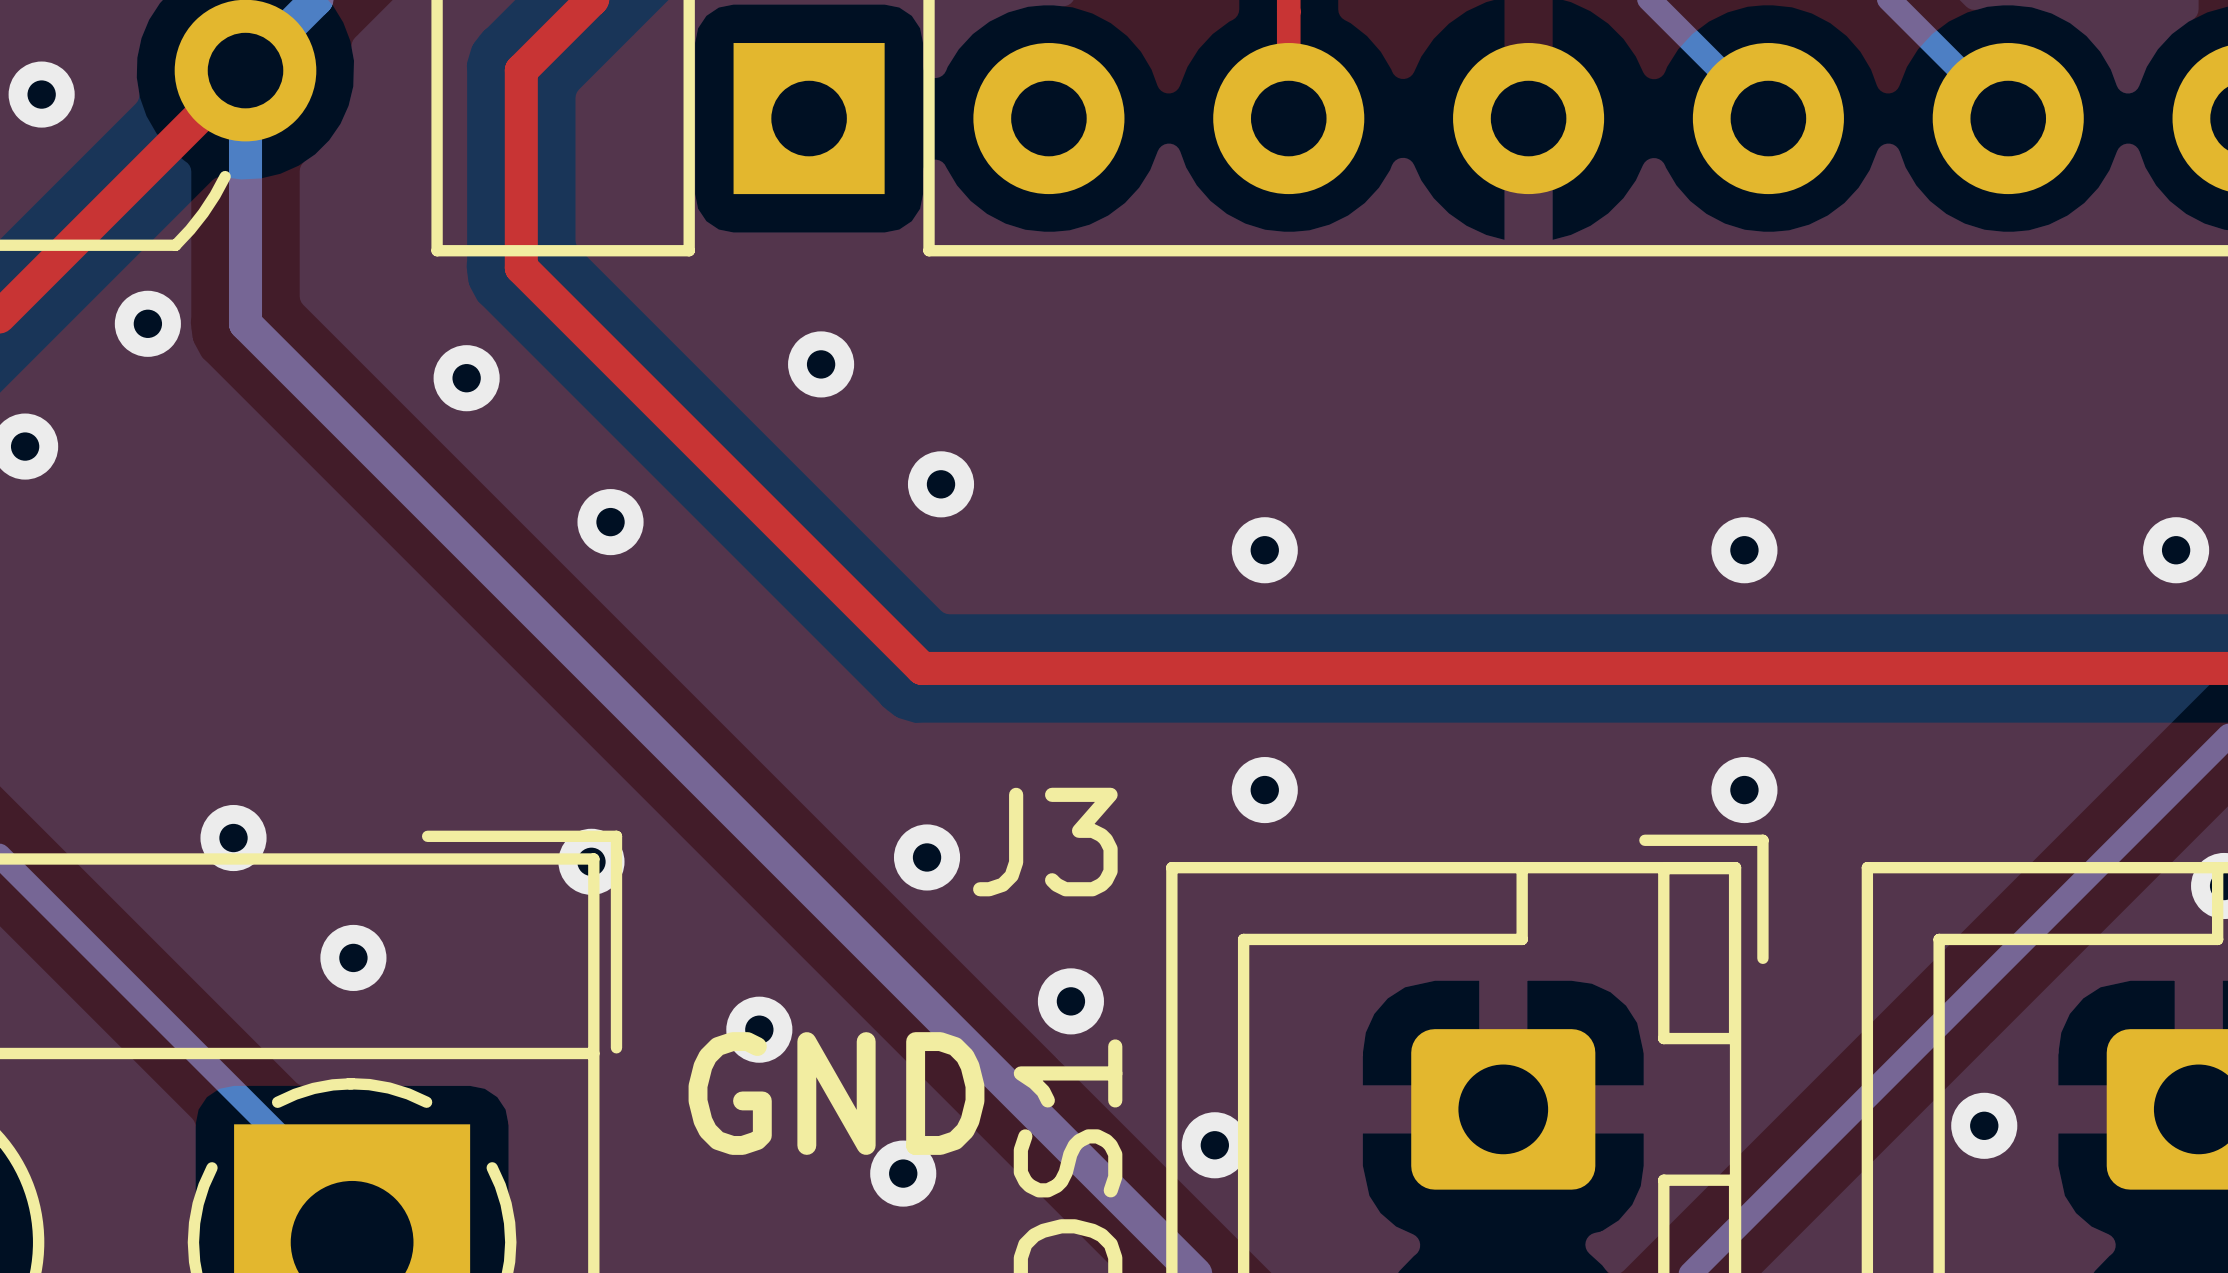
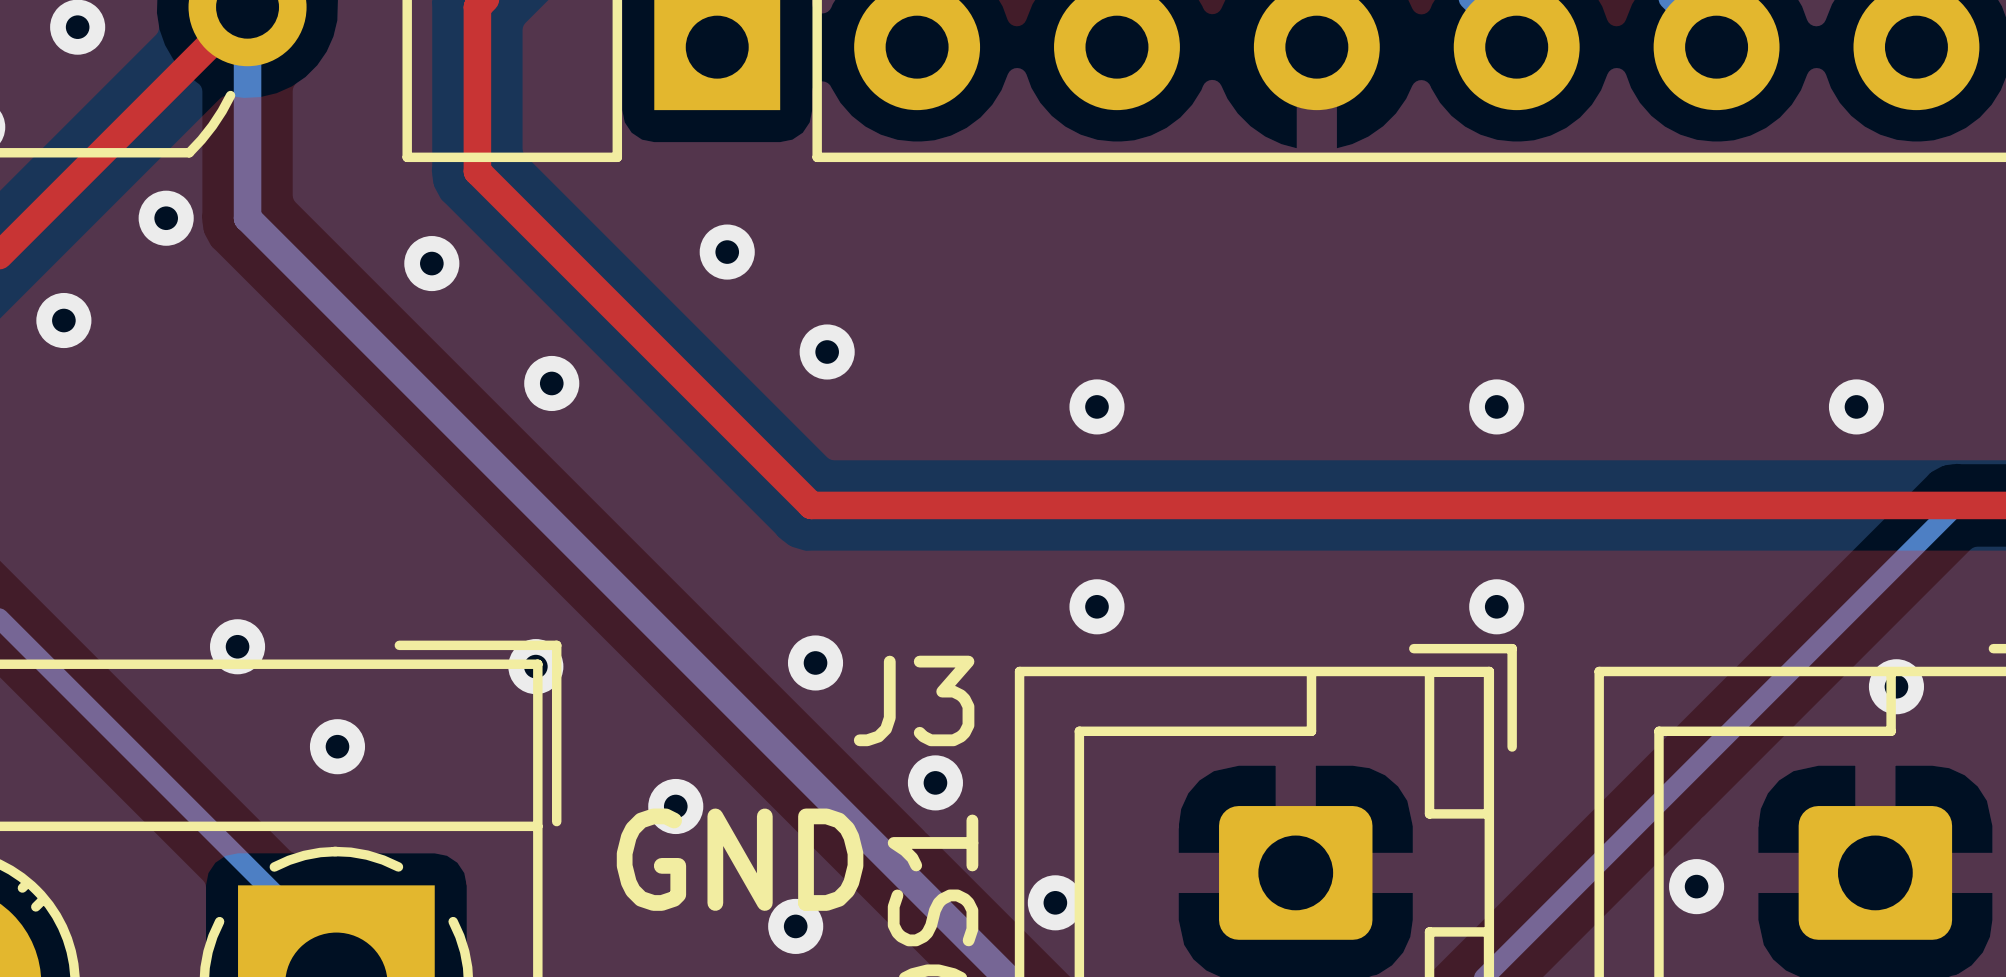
J3 name position: J3 (1045, 842) -> J3 (914, 700)

